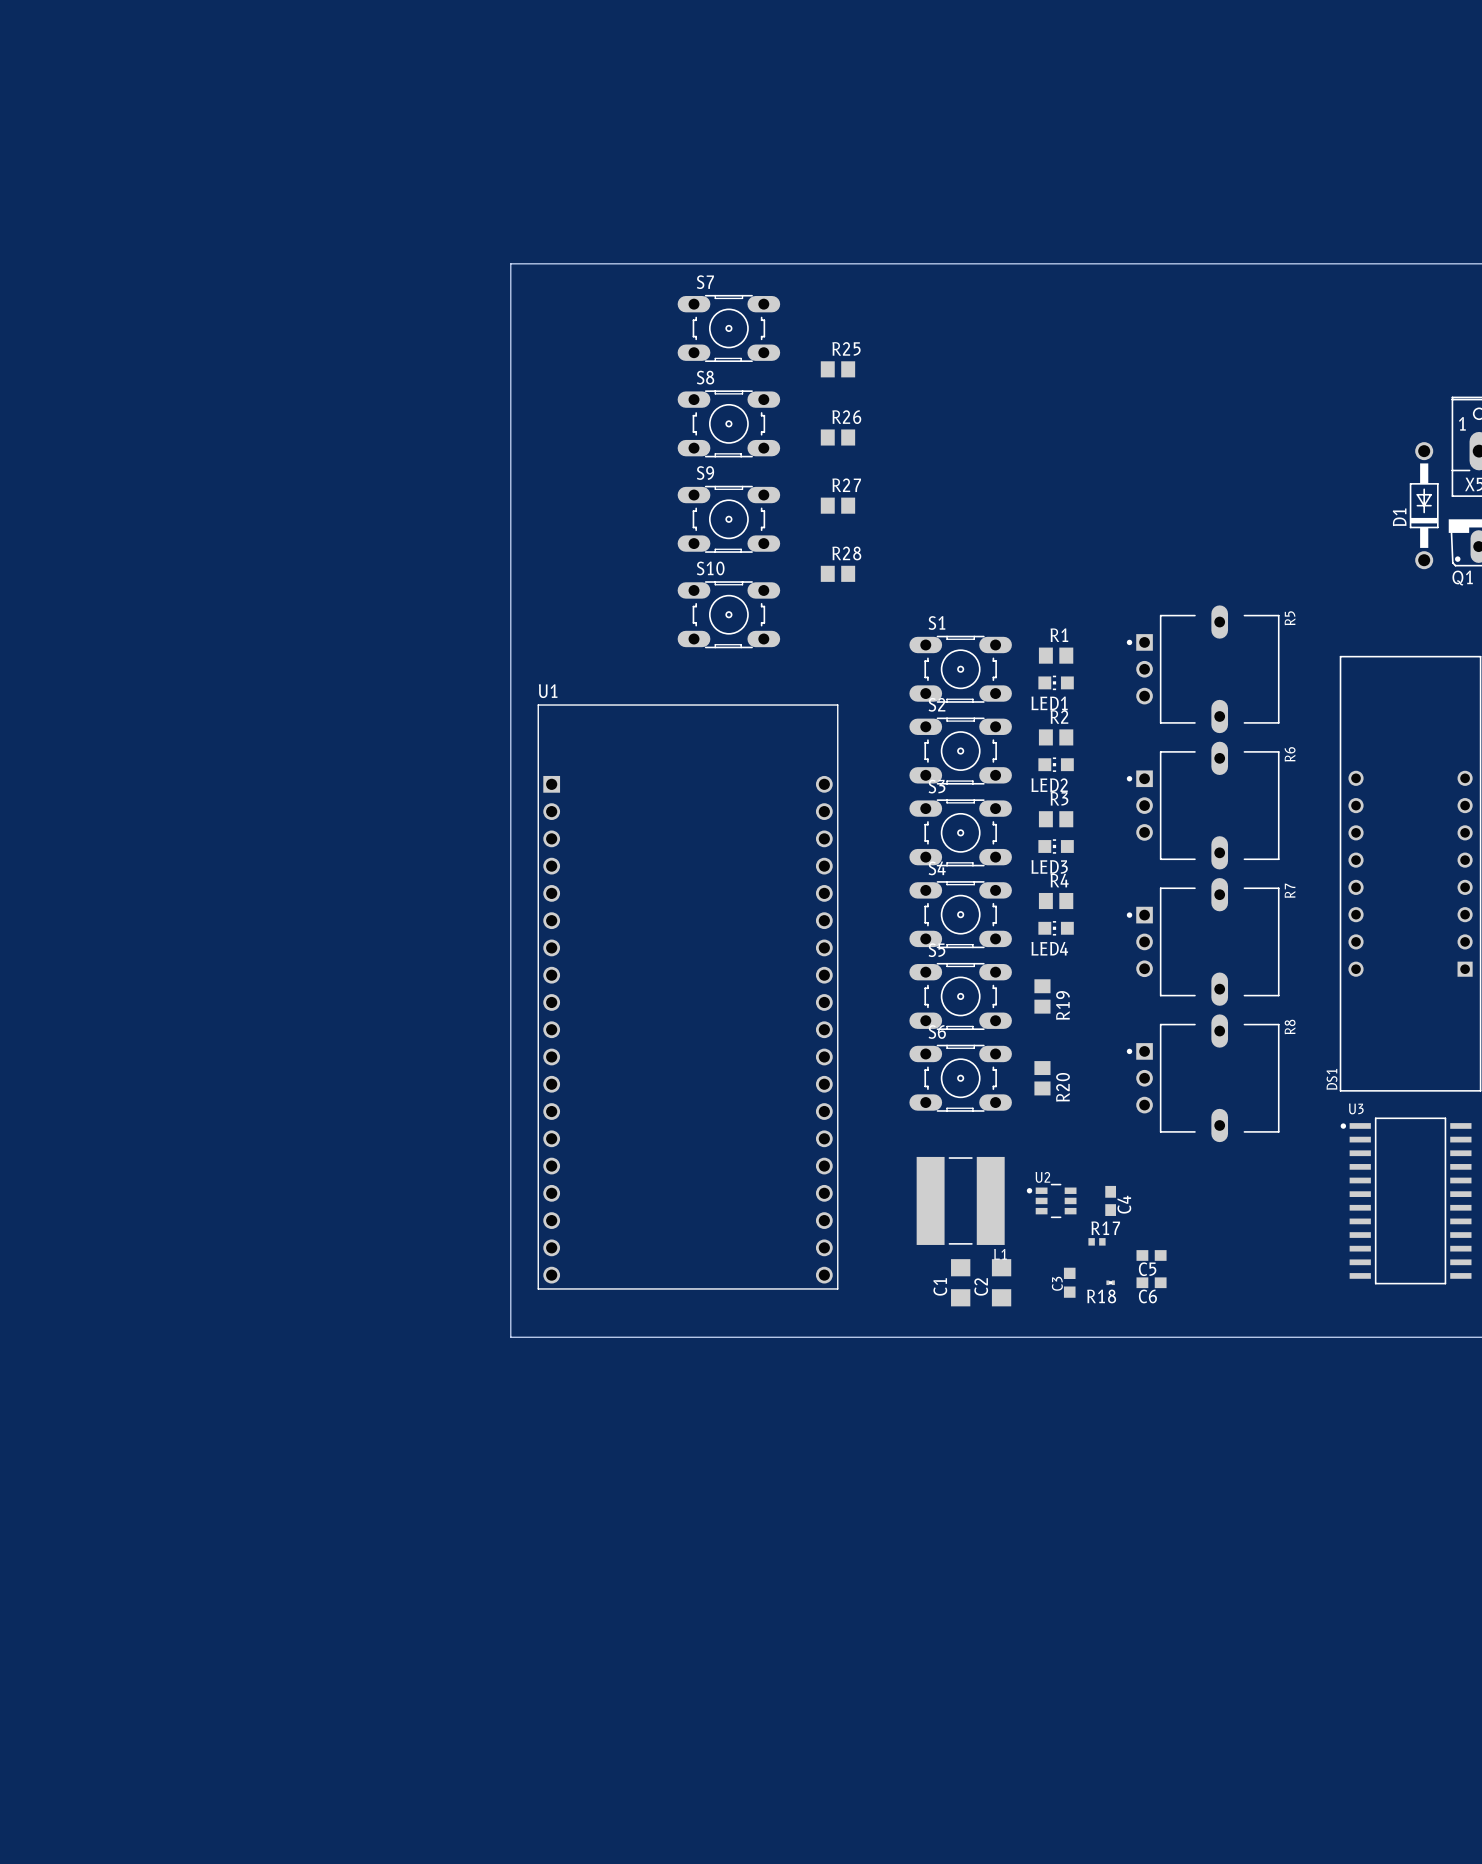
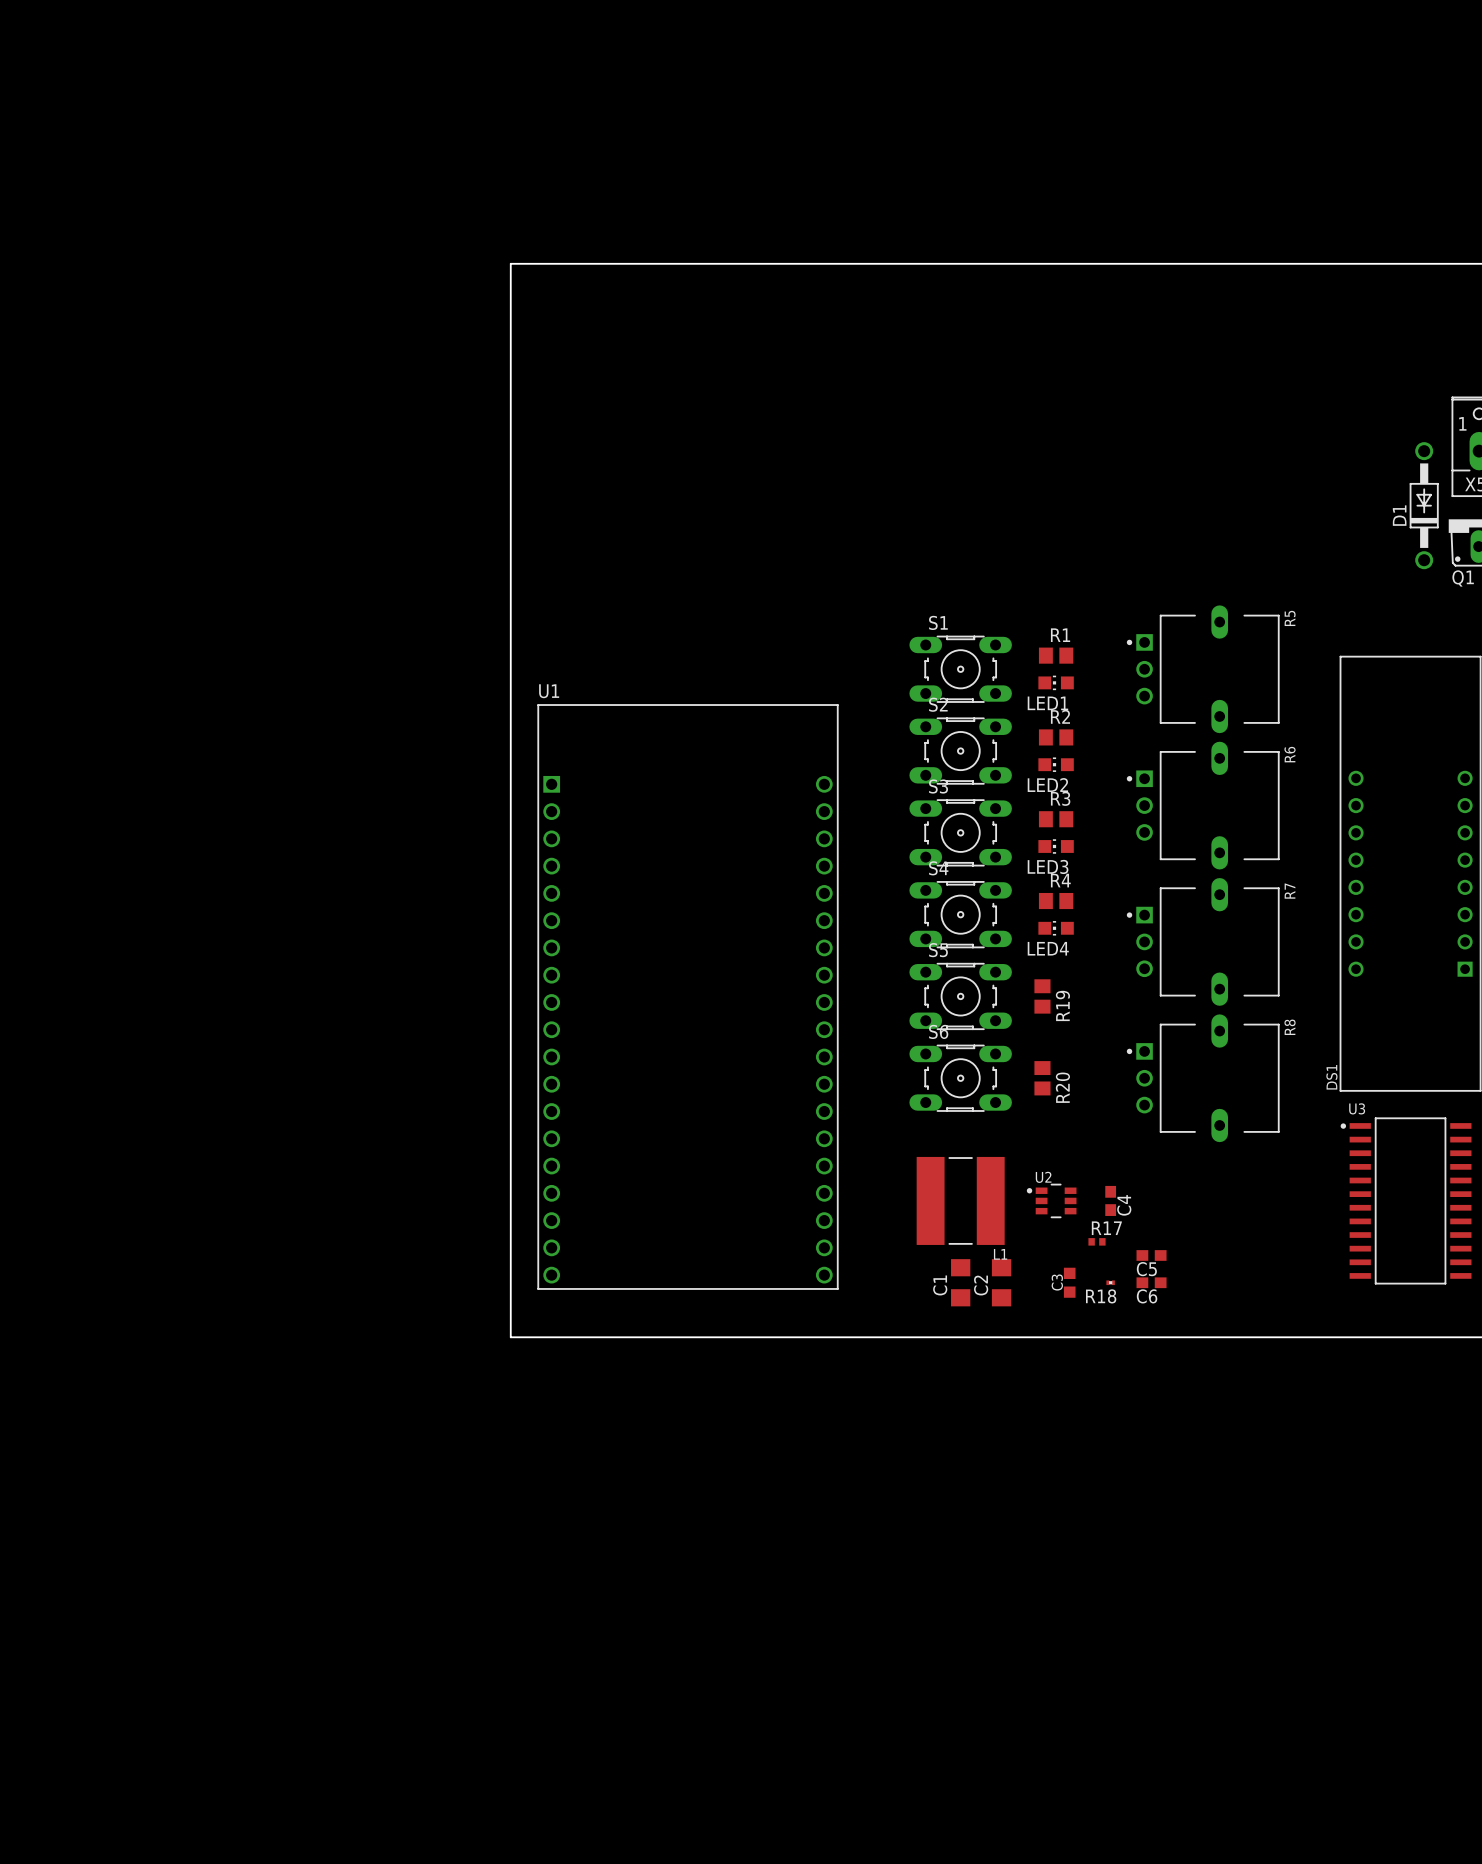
S7: (728, 328) -> none
R25: (837, 369) -> none
S8: (728, 423) -> none
R26: (837, 437) -> none
R27: (837, 505) -> none
S9: (728, 519) -> none
R28: (837, 573) -> none
S10: (728, 614) -> none

